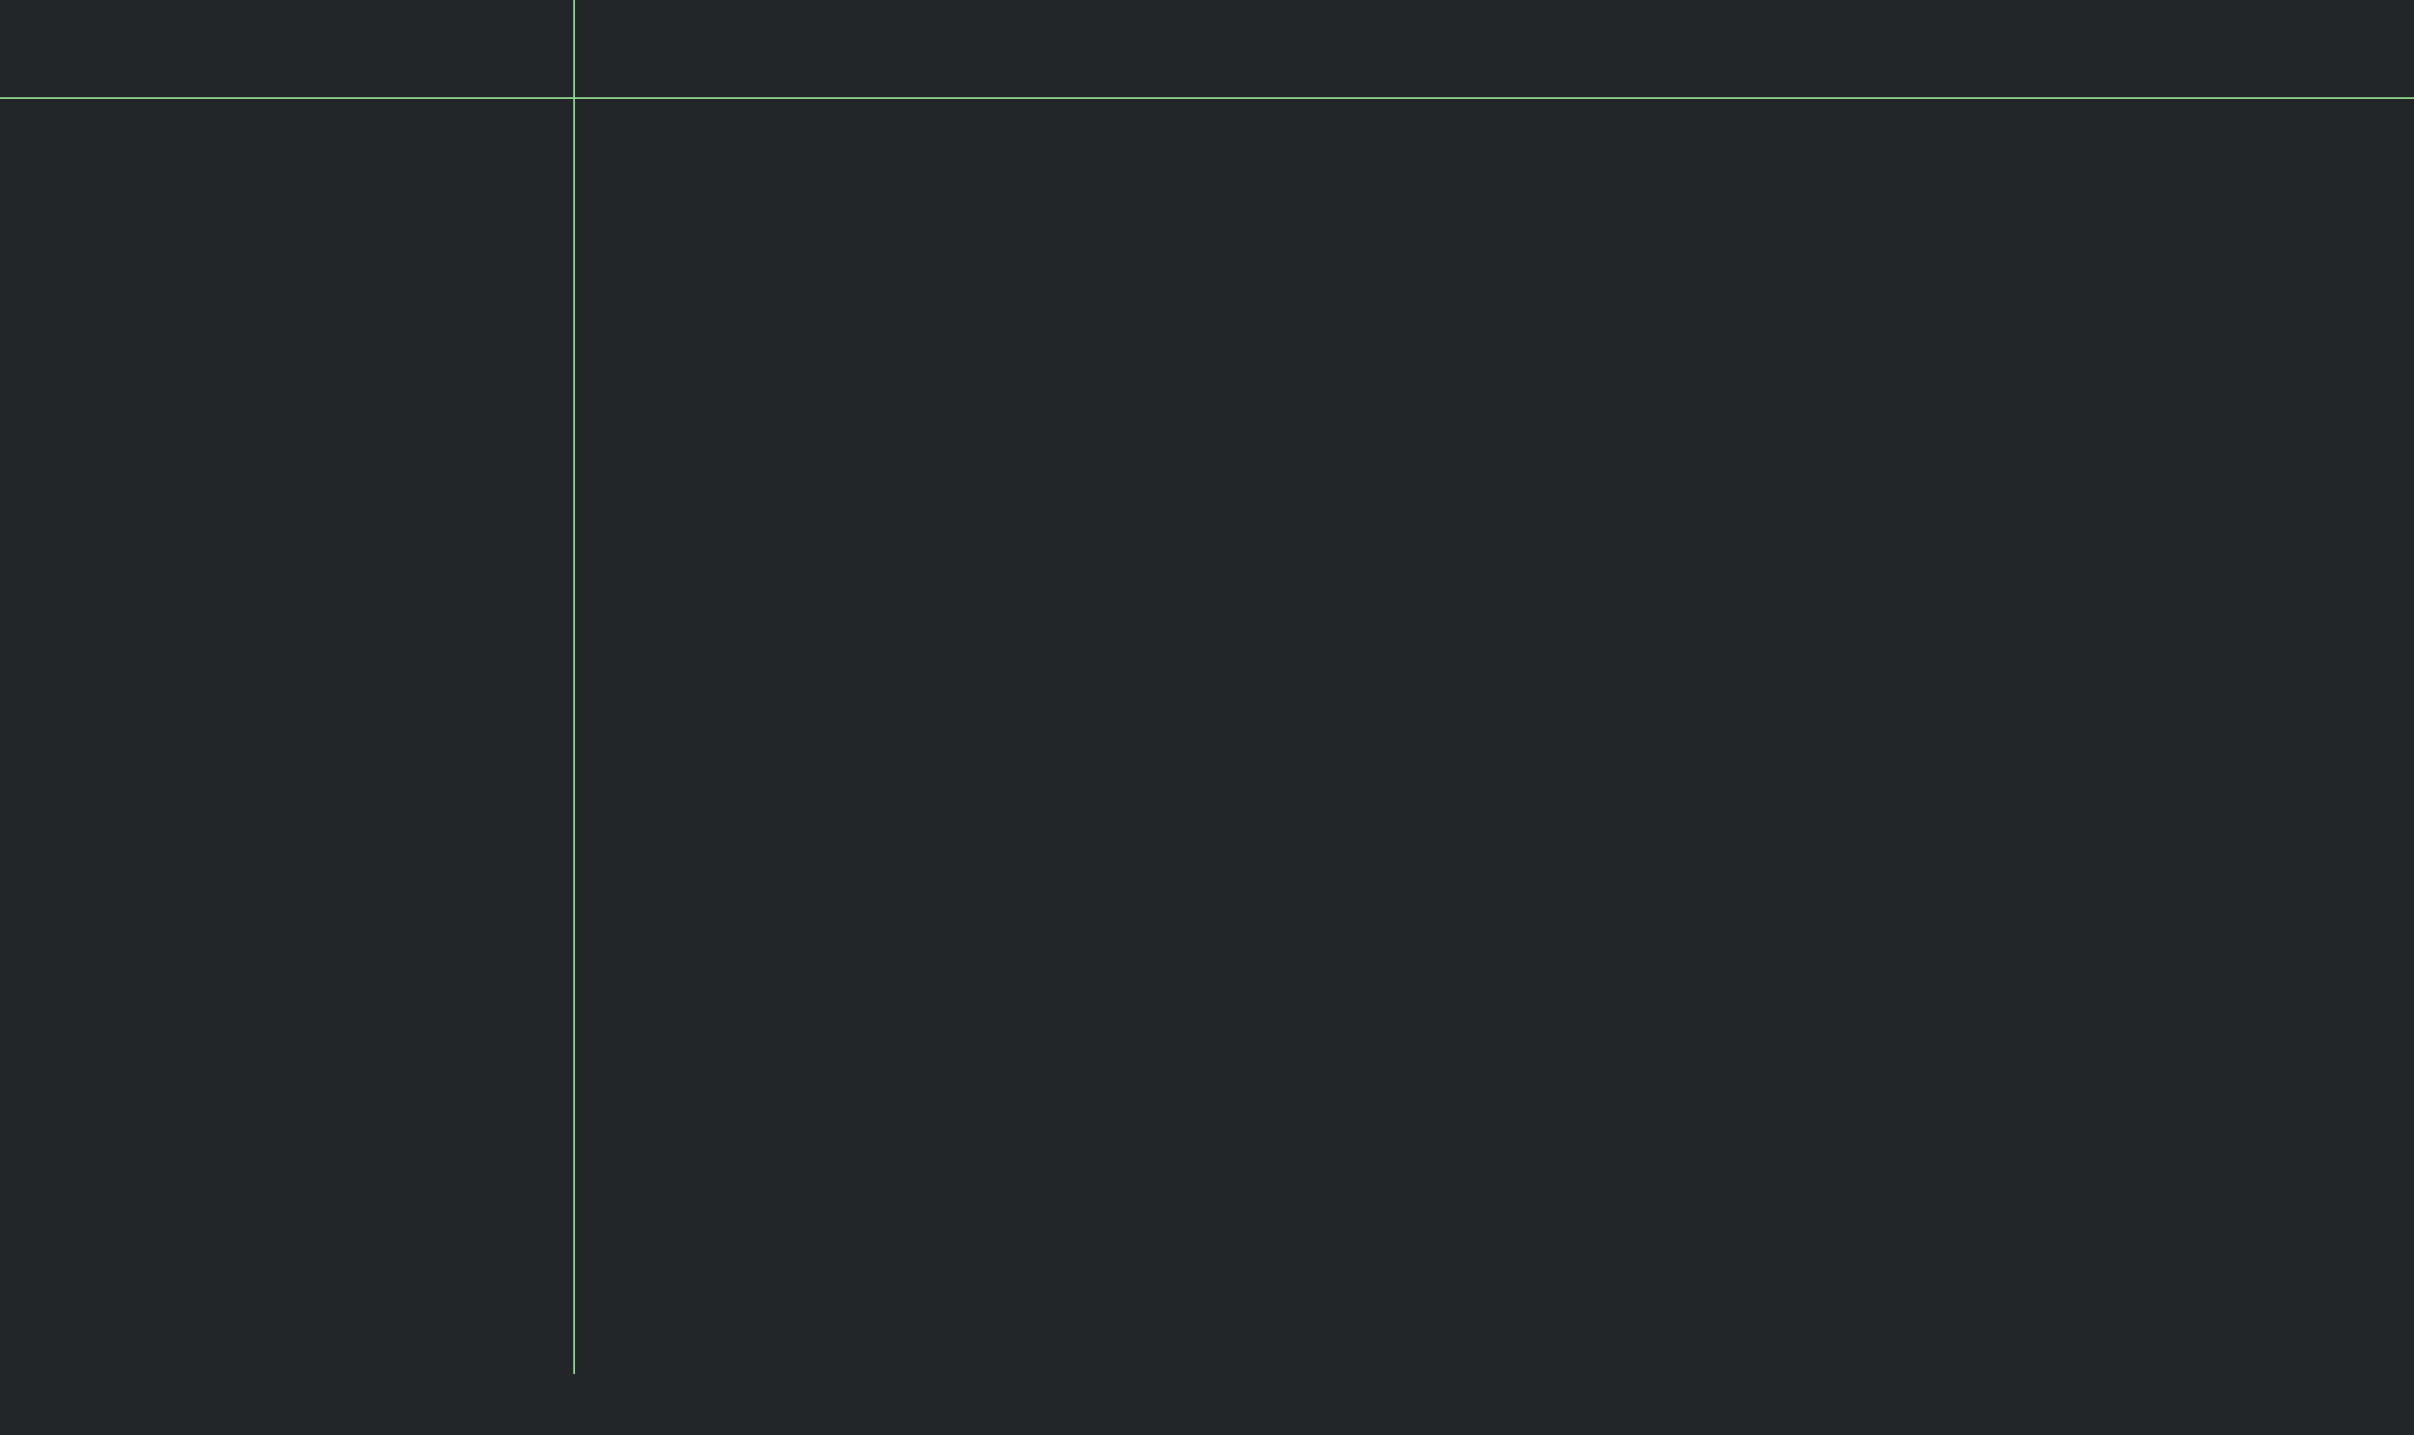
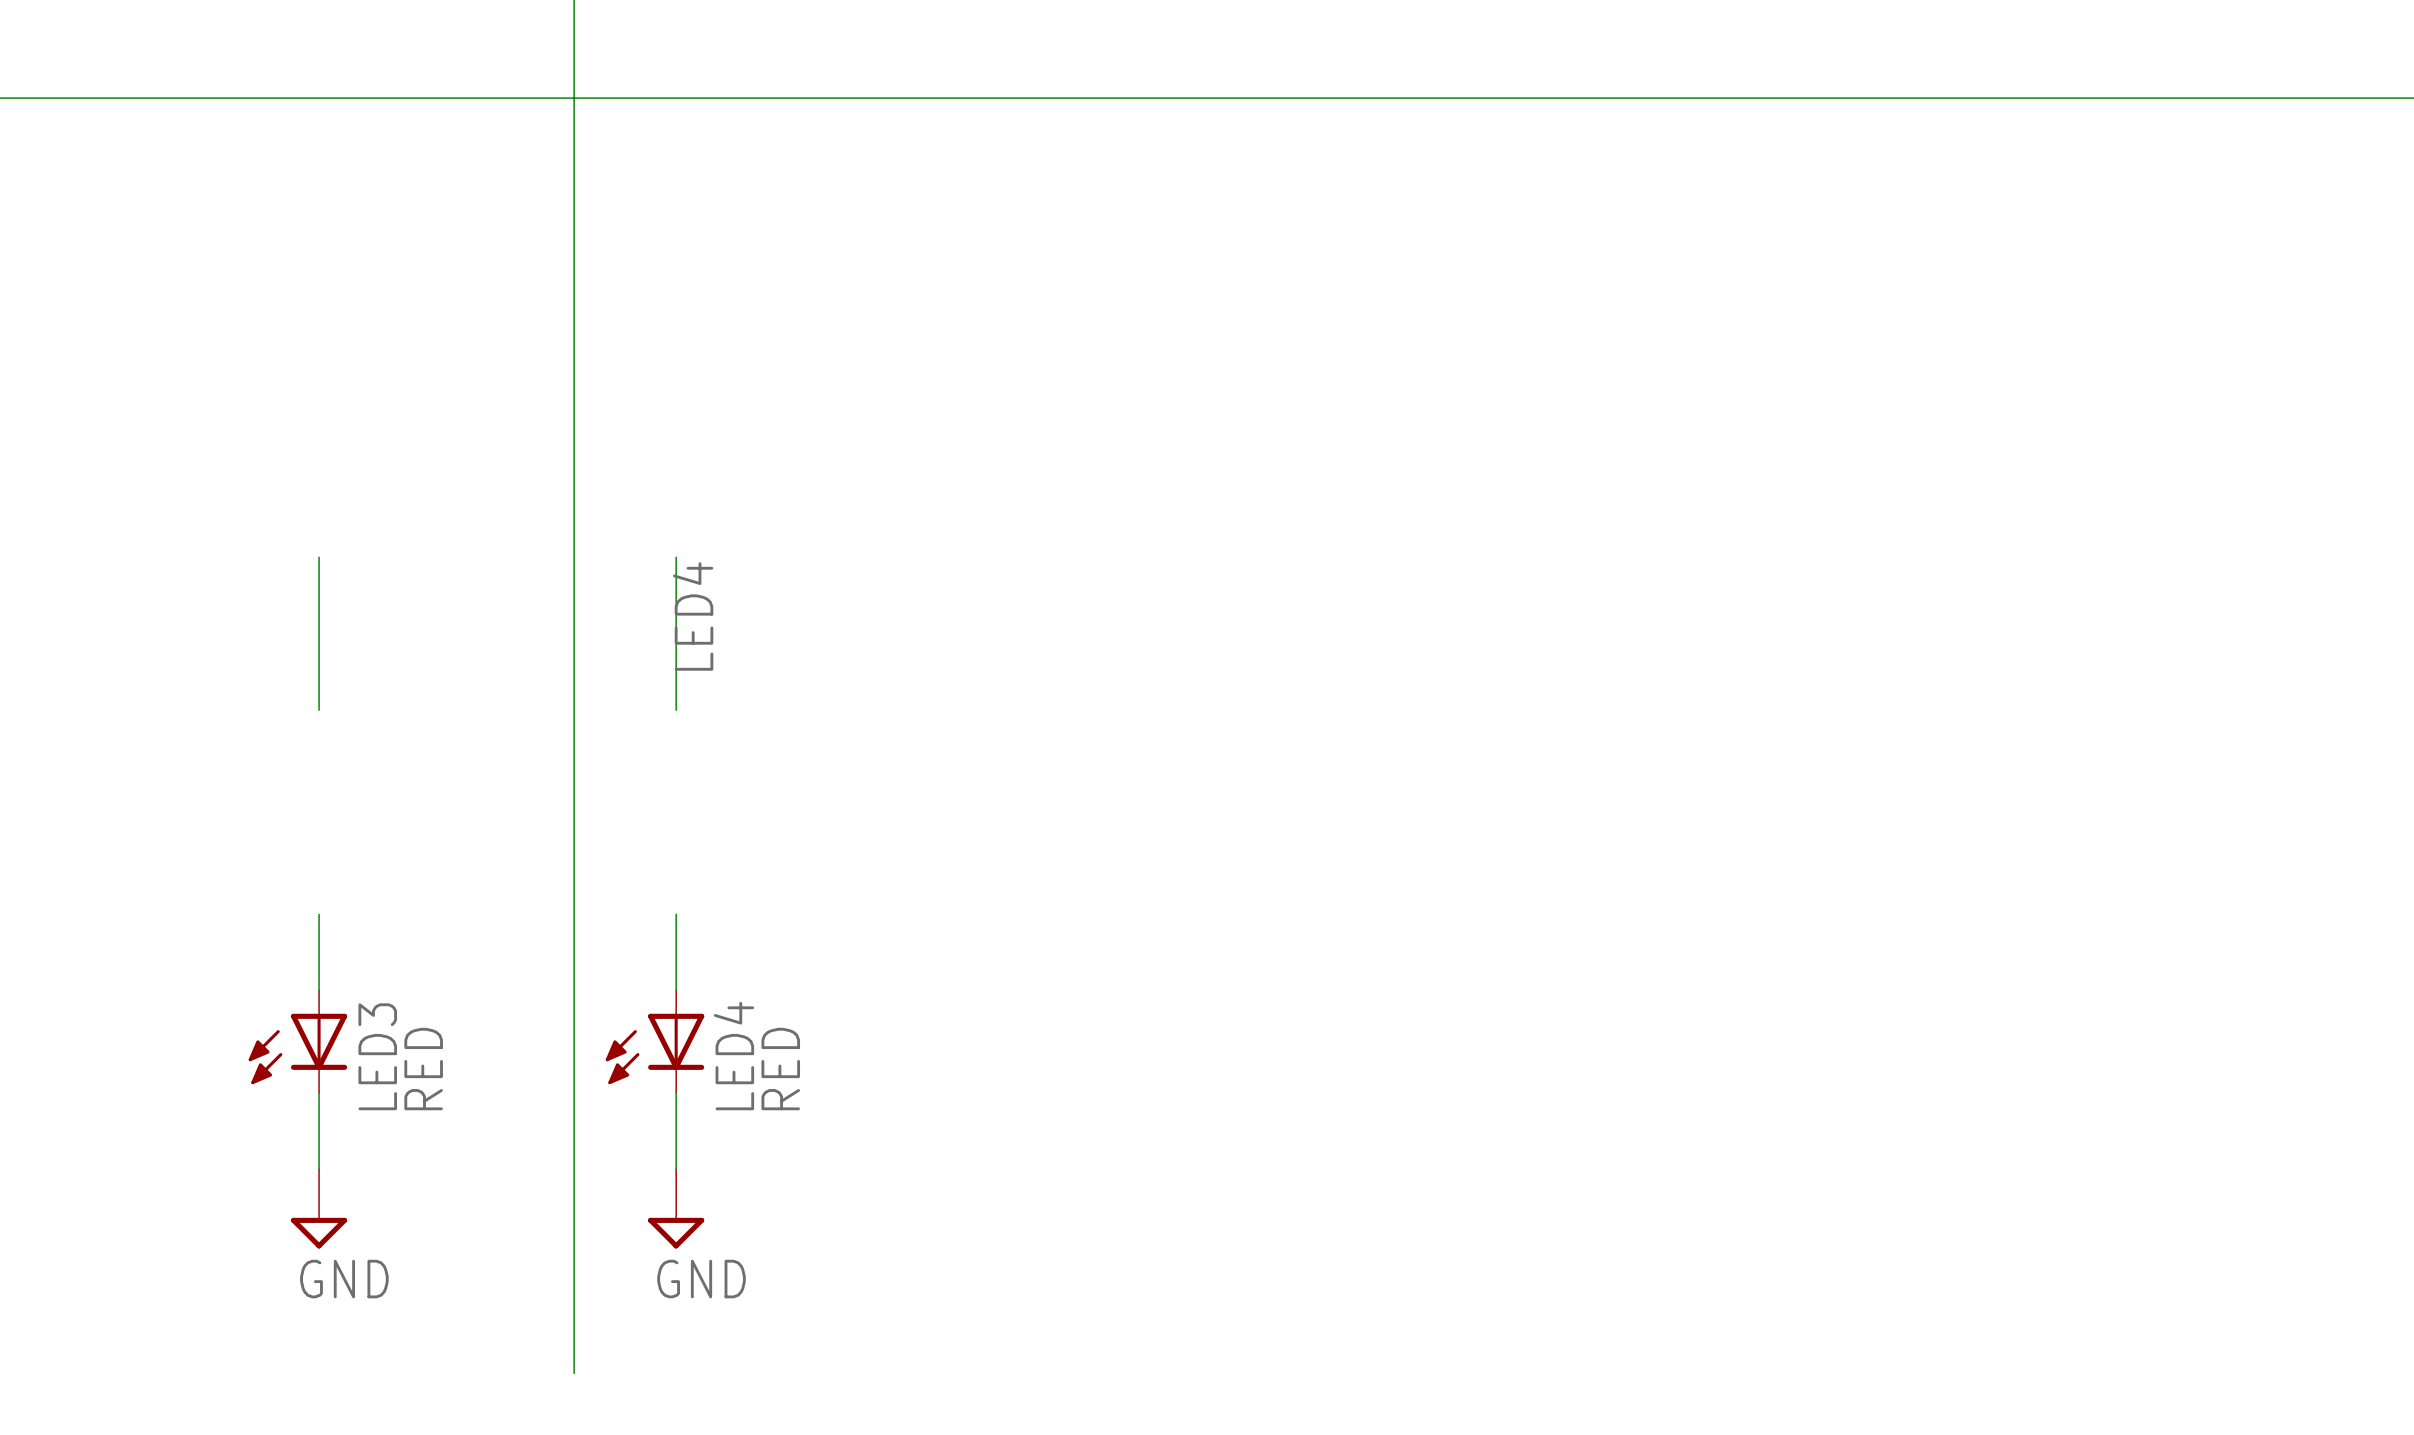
wire: none -> (319, 557) (319, 710)
wire: none -> (676, 557) (676, 710)
label: none -> LED4 (693, 616)
wire: none -> (319, 914) (319, 990)
wire: none -> (676, 914) (676, 990)
LED3: none -> RED (297, 1041)
LED4: none -> RED (654, 1041)
wire: none -> (319, 1092) (319, 1169)
wire: none -> (676, 1092) (676, 1169)
power symbol: none -> GND (319, 1208)
power symbol: none -> GND (676, 1208)

